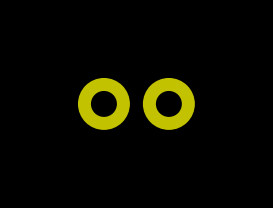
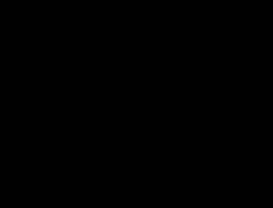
part: (136, 103) -> none

